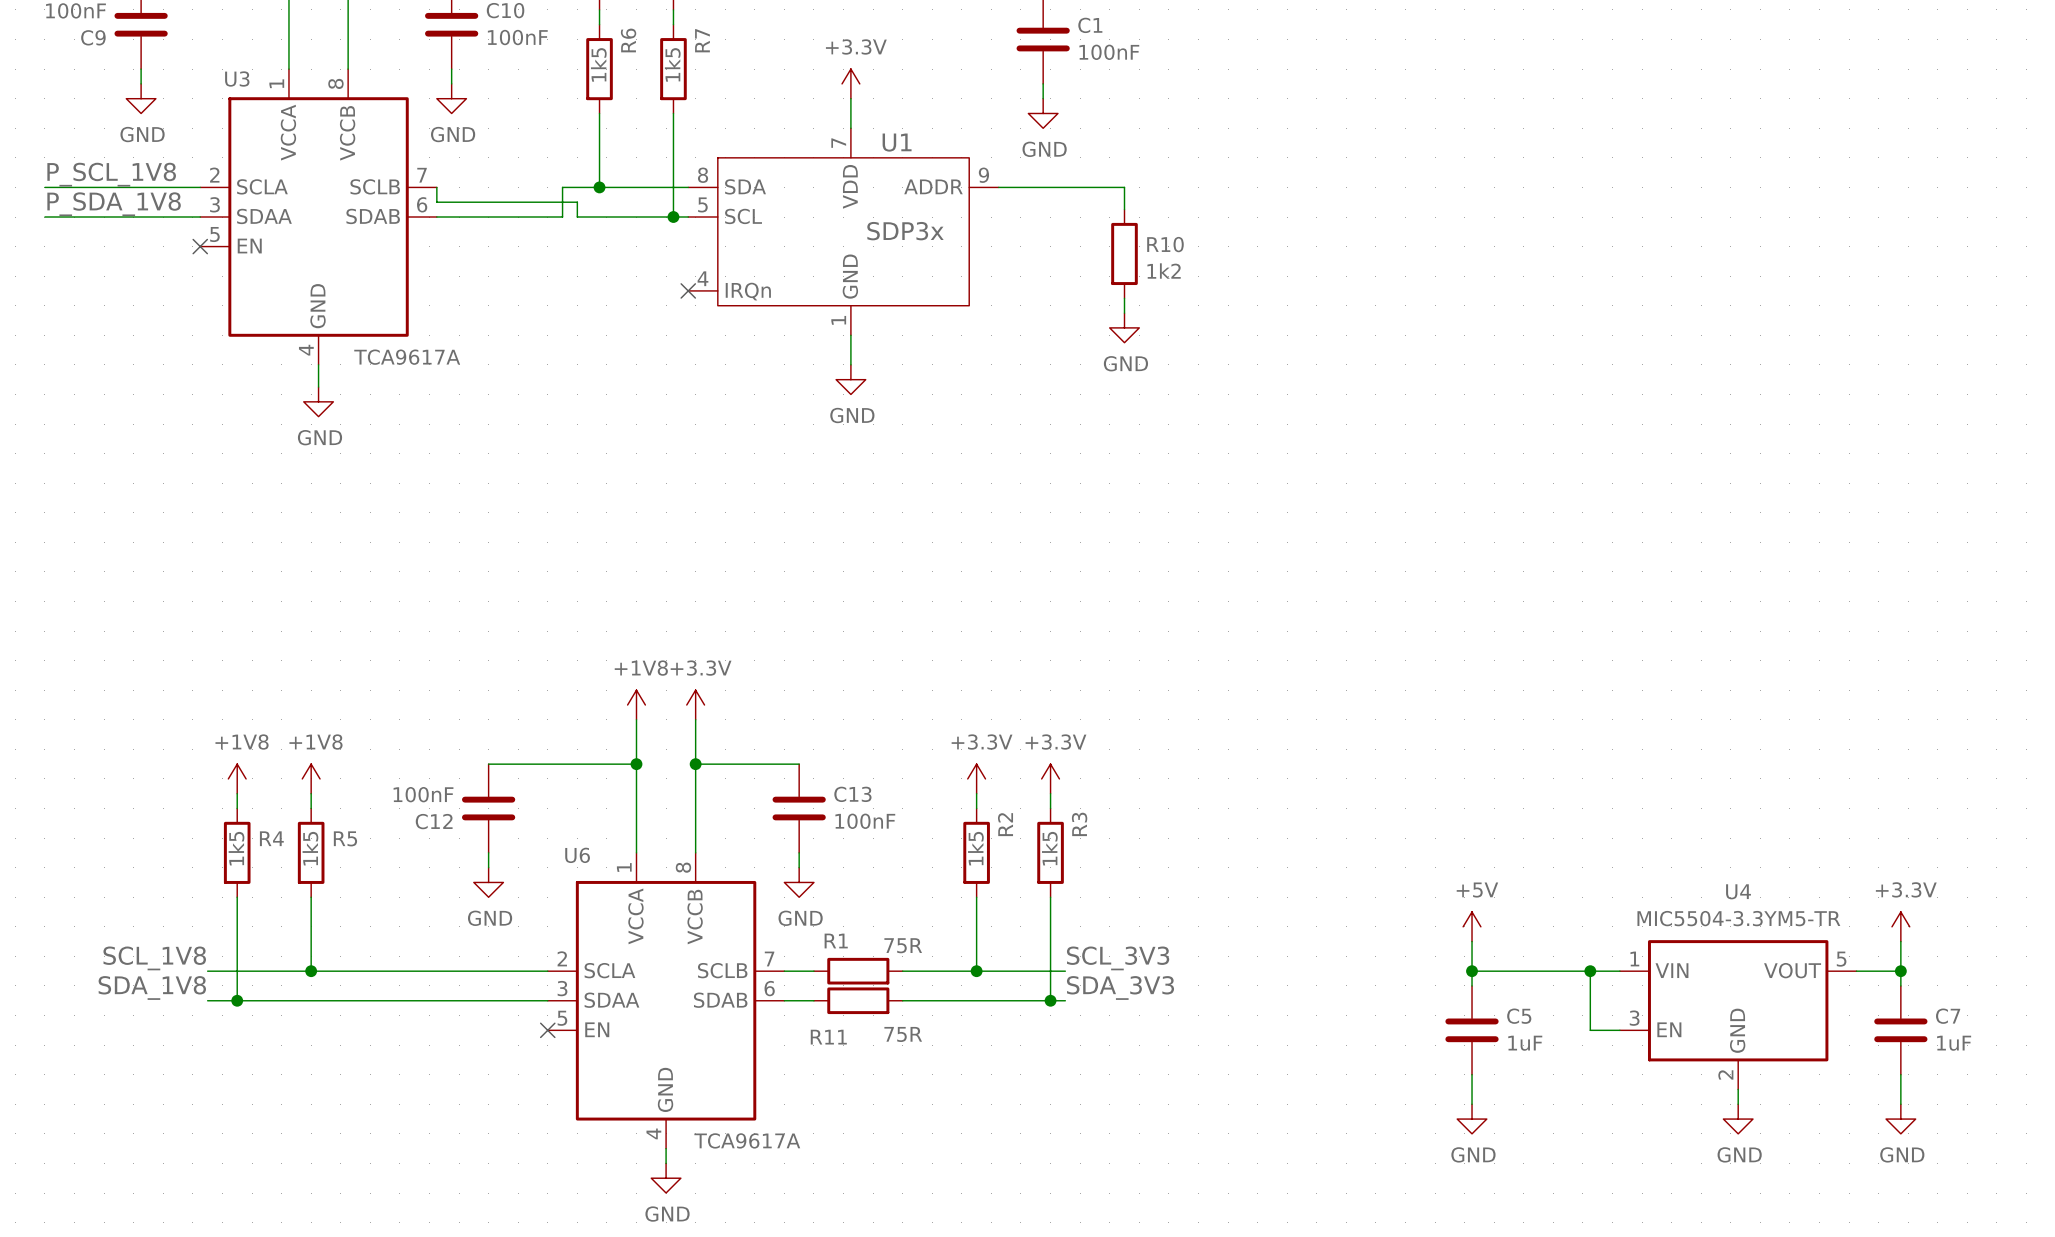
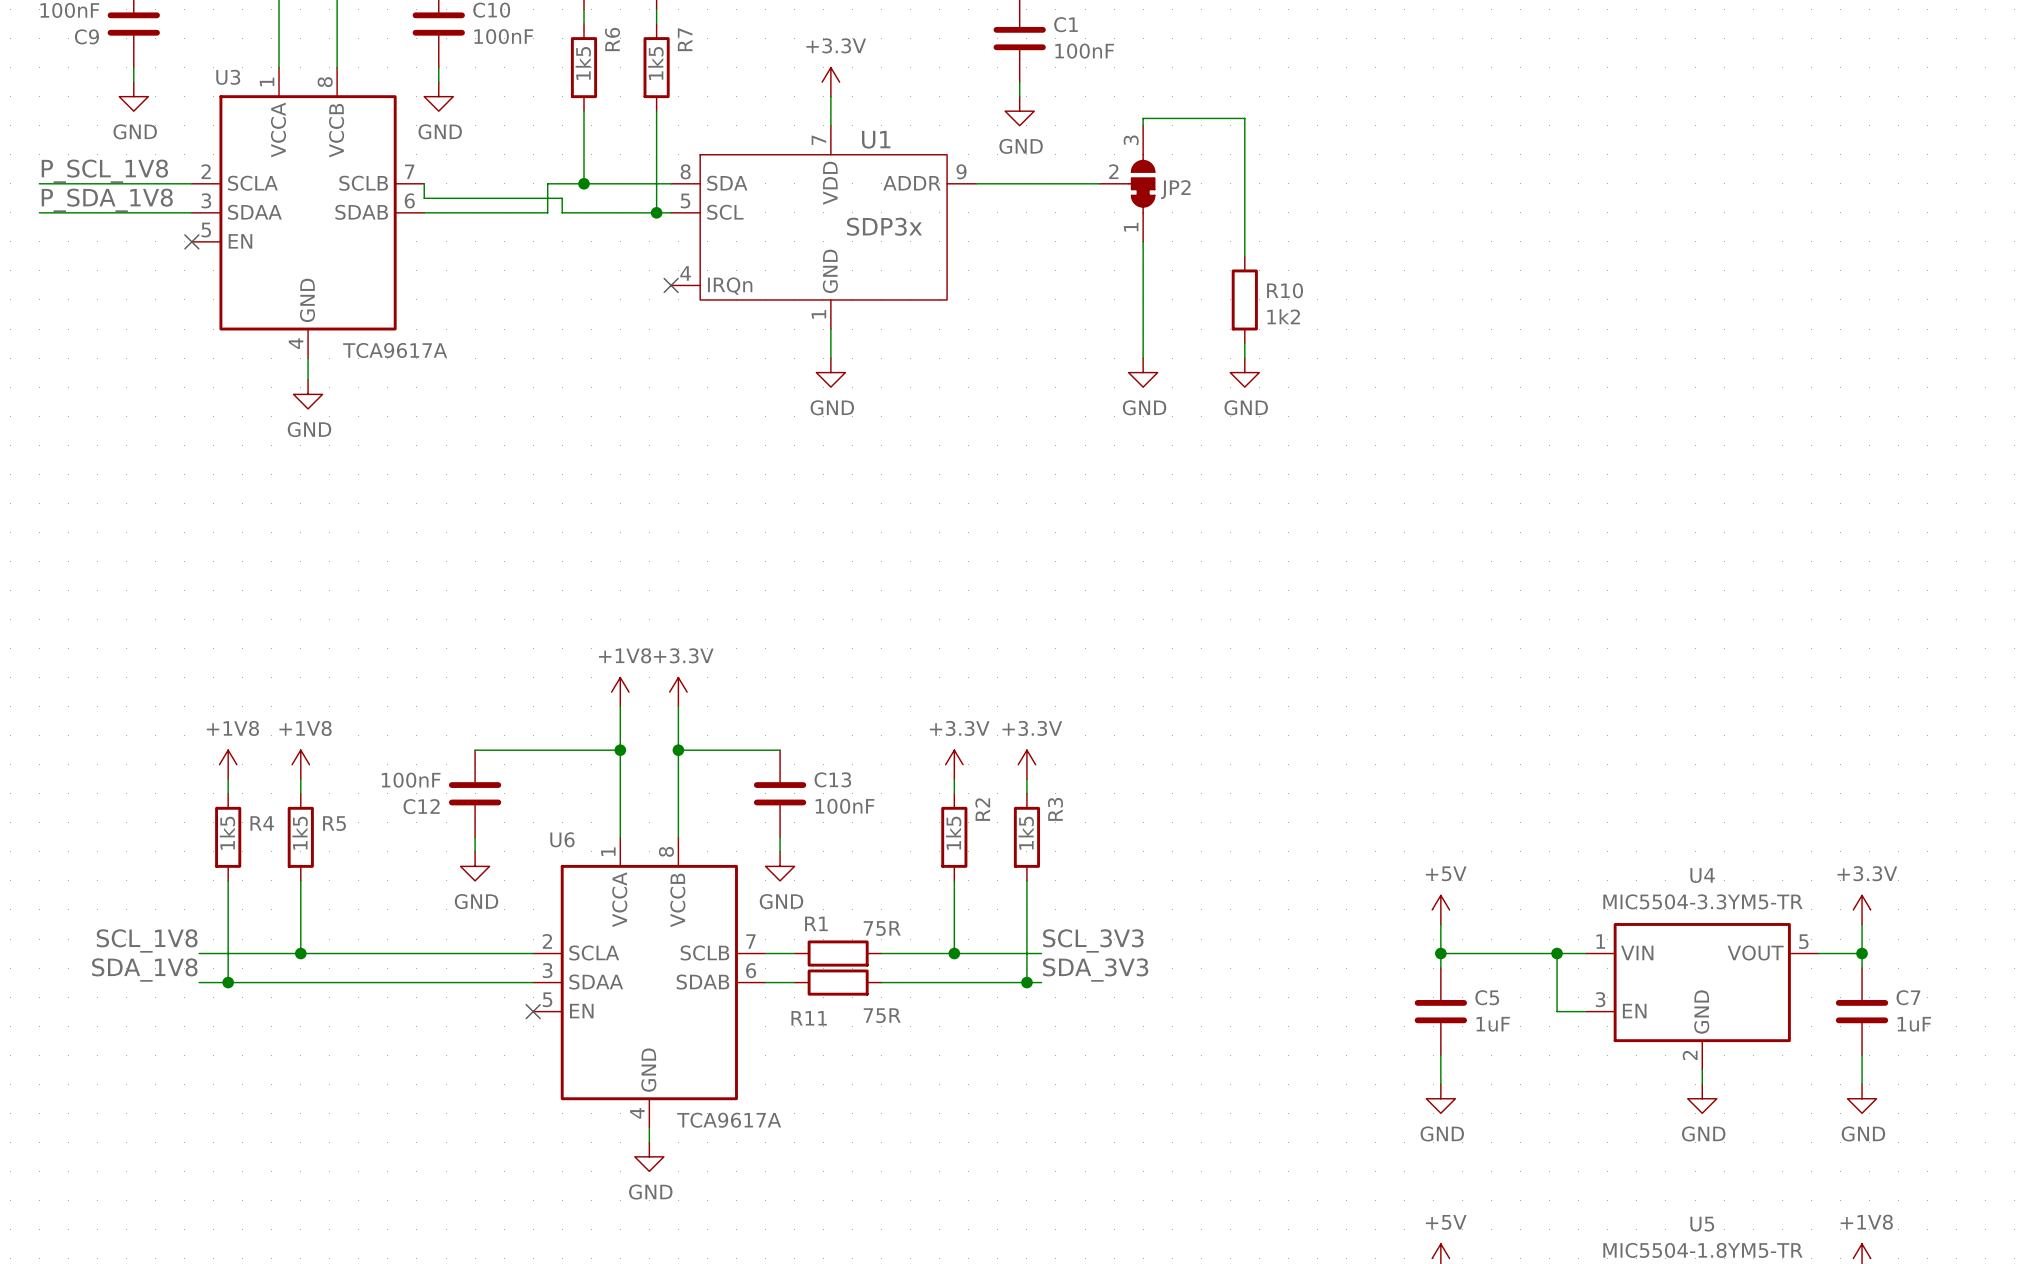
wire: none -> (1143, 125) (1143, 118) (1244, 118) (1244, 256)
wire: (1124, 187) (1124, 209) -> none
JP2: none -> (1127, 183)
wire: none -> (1143, 241) (1143, 358)
R10 position: (1124, 253) -> (1244, 299)
wire: (1124, 298) (1124, 313) -> (1244, 343) (1244, 358)
power symbol position: GND (1124, 327) -> GND (1143, 372)
power symbol: none -> GND (1244, 372)

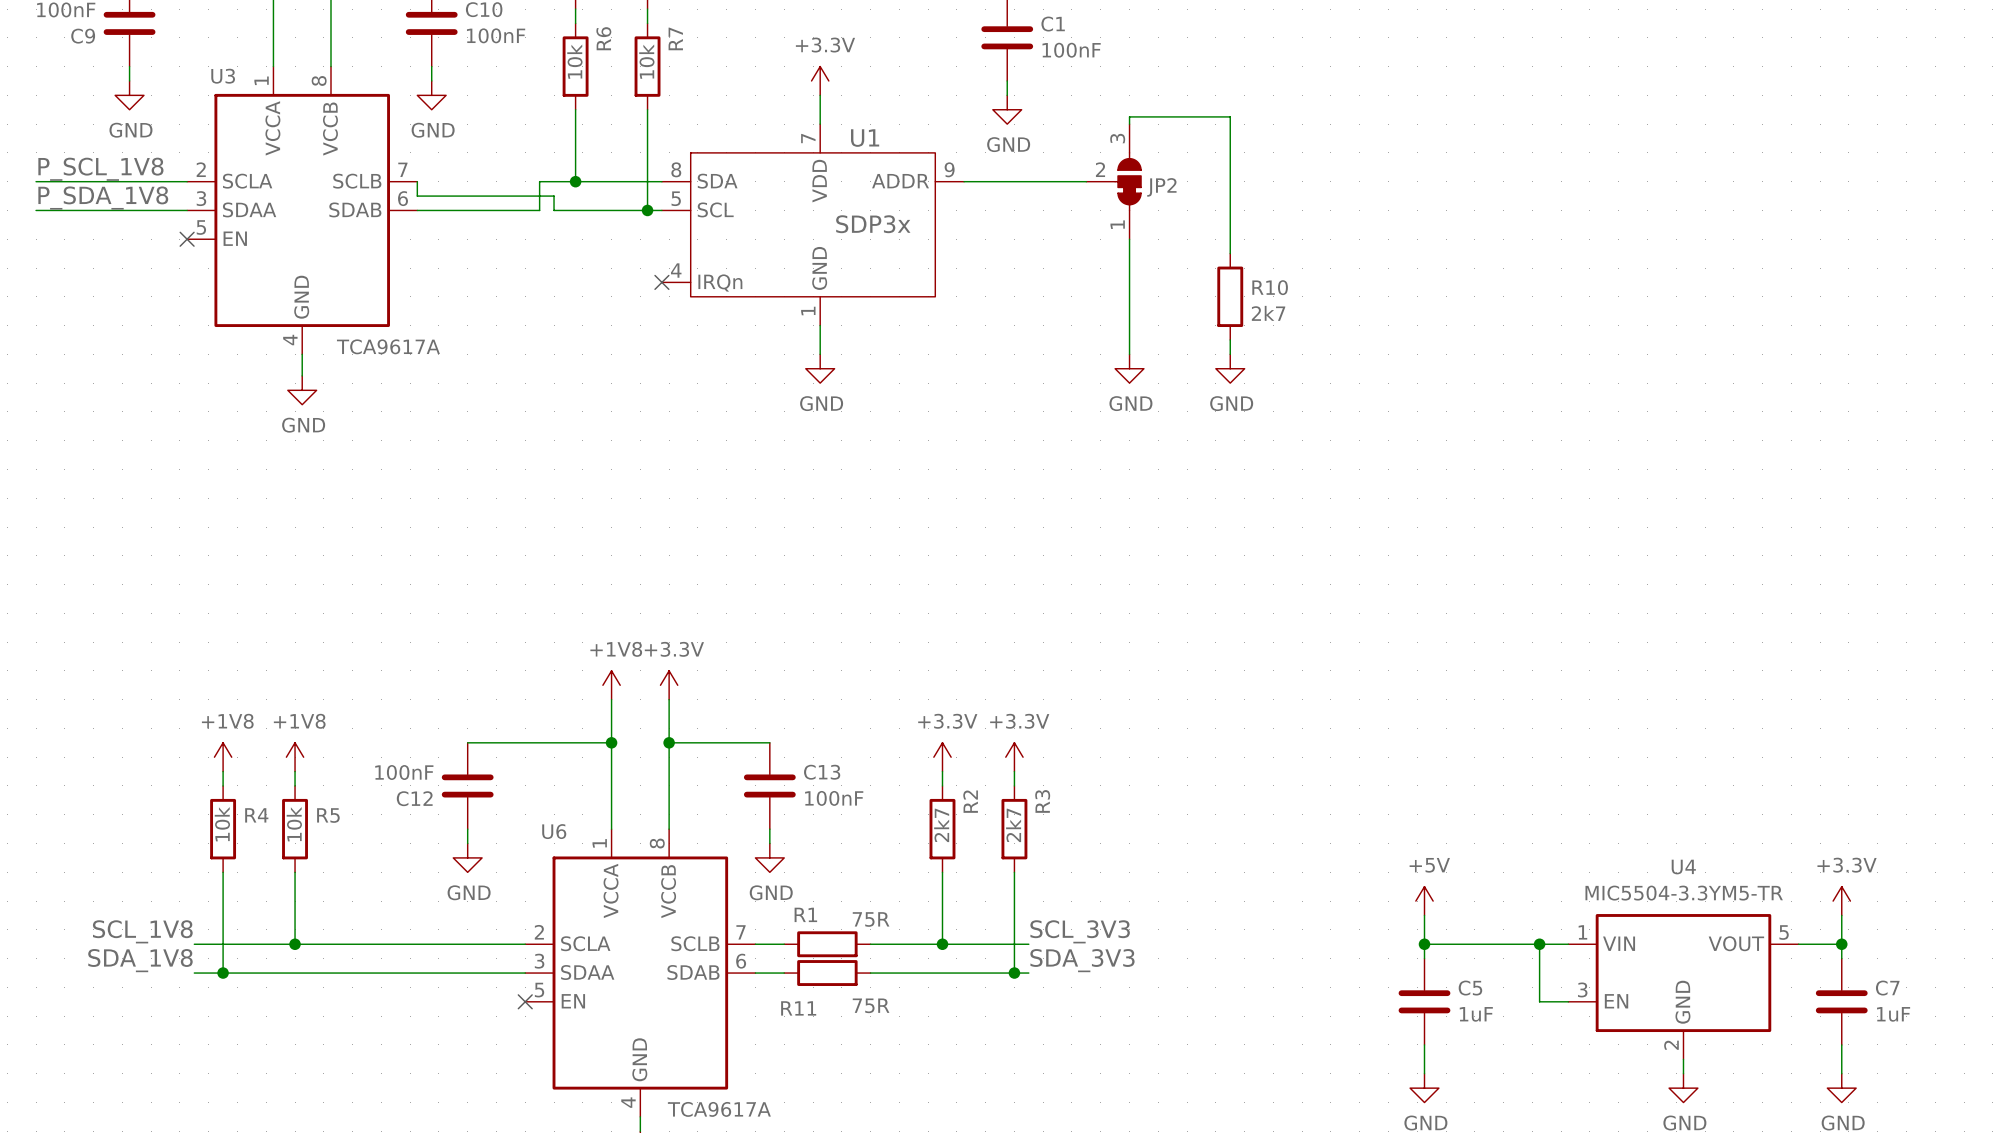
R6 value: 1k5 (583, 63) -> 10k (574, 61)
R7 value: 1k5 (655, 63) -> 10k (646, 61)
R10 value: 1k2 (1283, 316) -> 2k7 (1268, 313)
R4 value: 1k5 (227, 833) -> 10k (222, 824)
R5 value: 1k5 (300, 833) -> 10k (294, 824)
R2 value: 1k5 (953, 833) -> 2k7 (941, 825)
R3 value: 1k5 (1026, 833) -> 2k7 (1013, 825)

